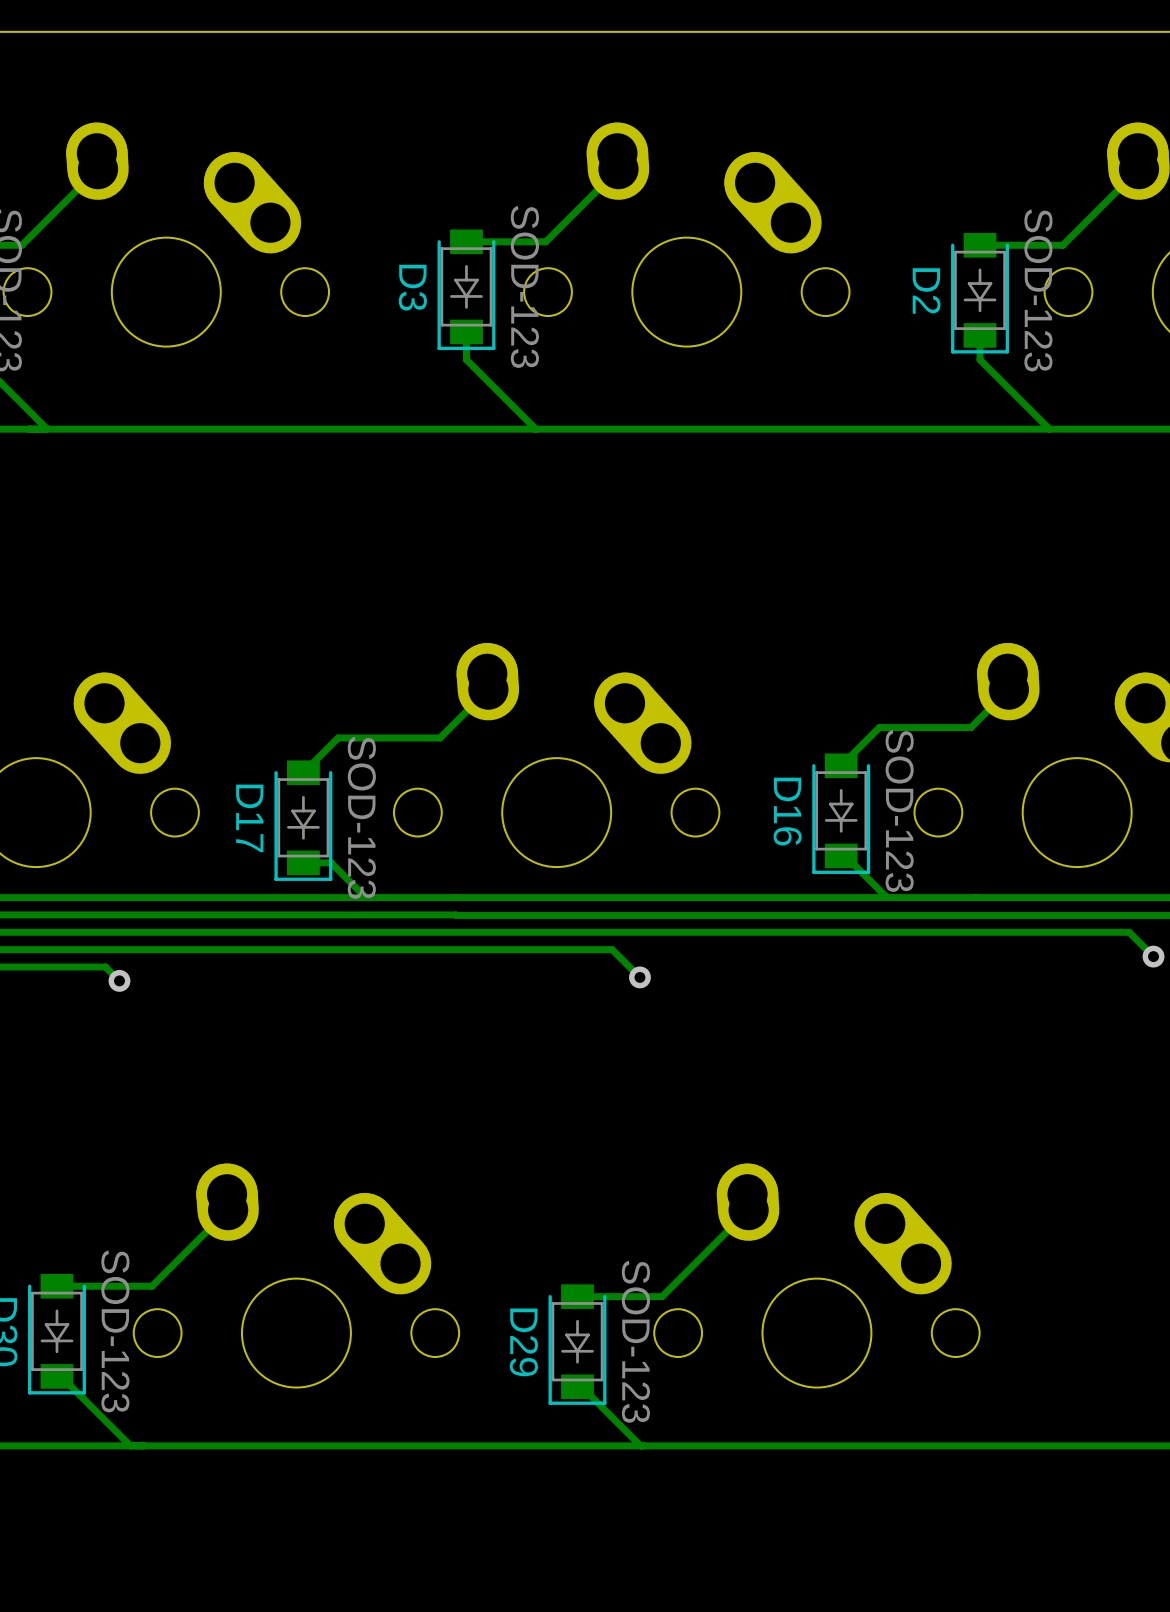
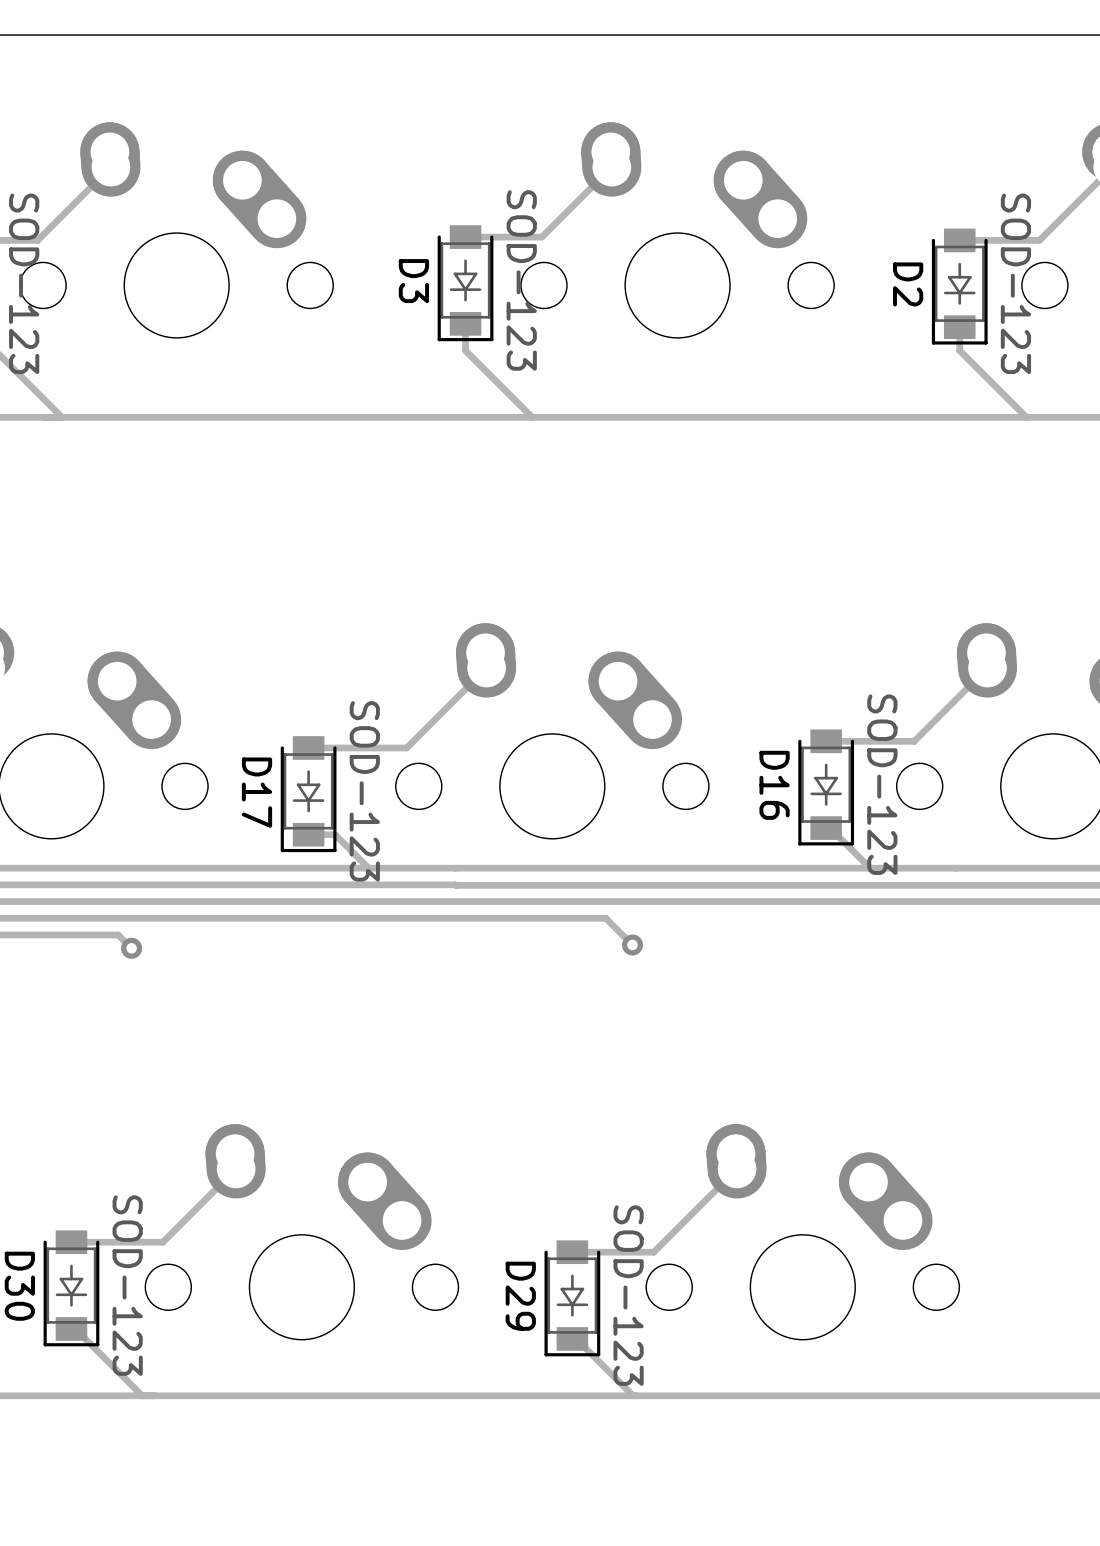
track: (970, 727) (879, 727) (841, 765) -> (951, 704) (914, 741) (826, 741)
track: (440, 737) (338, 737) (303, 772) -> (440, 714) (406, 747) (308, 747)

